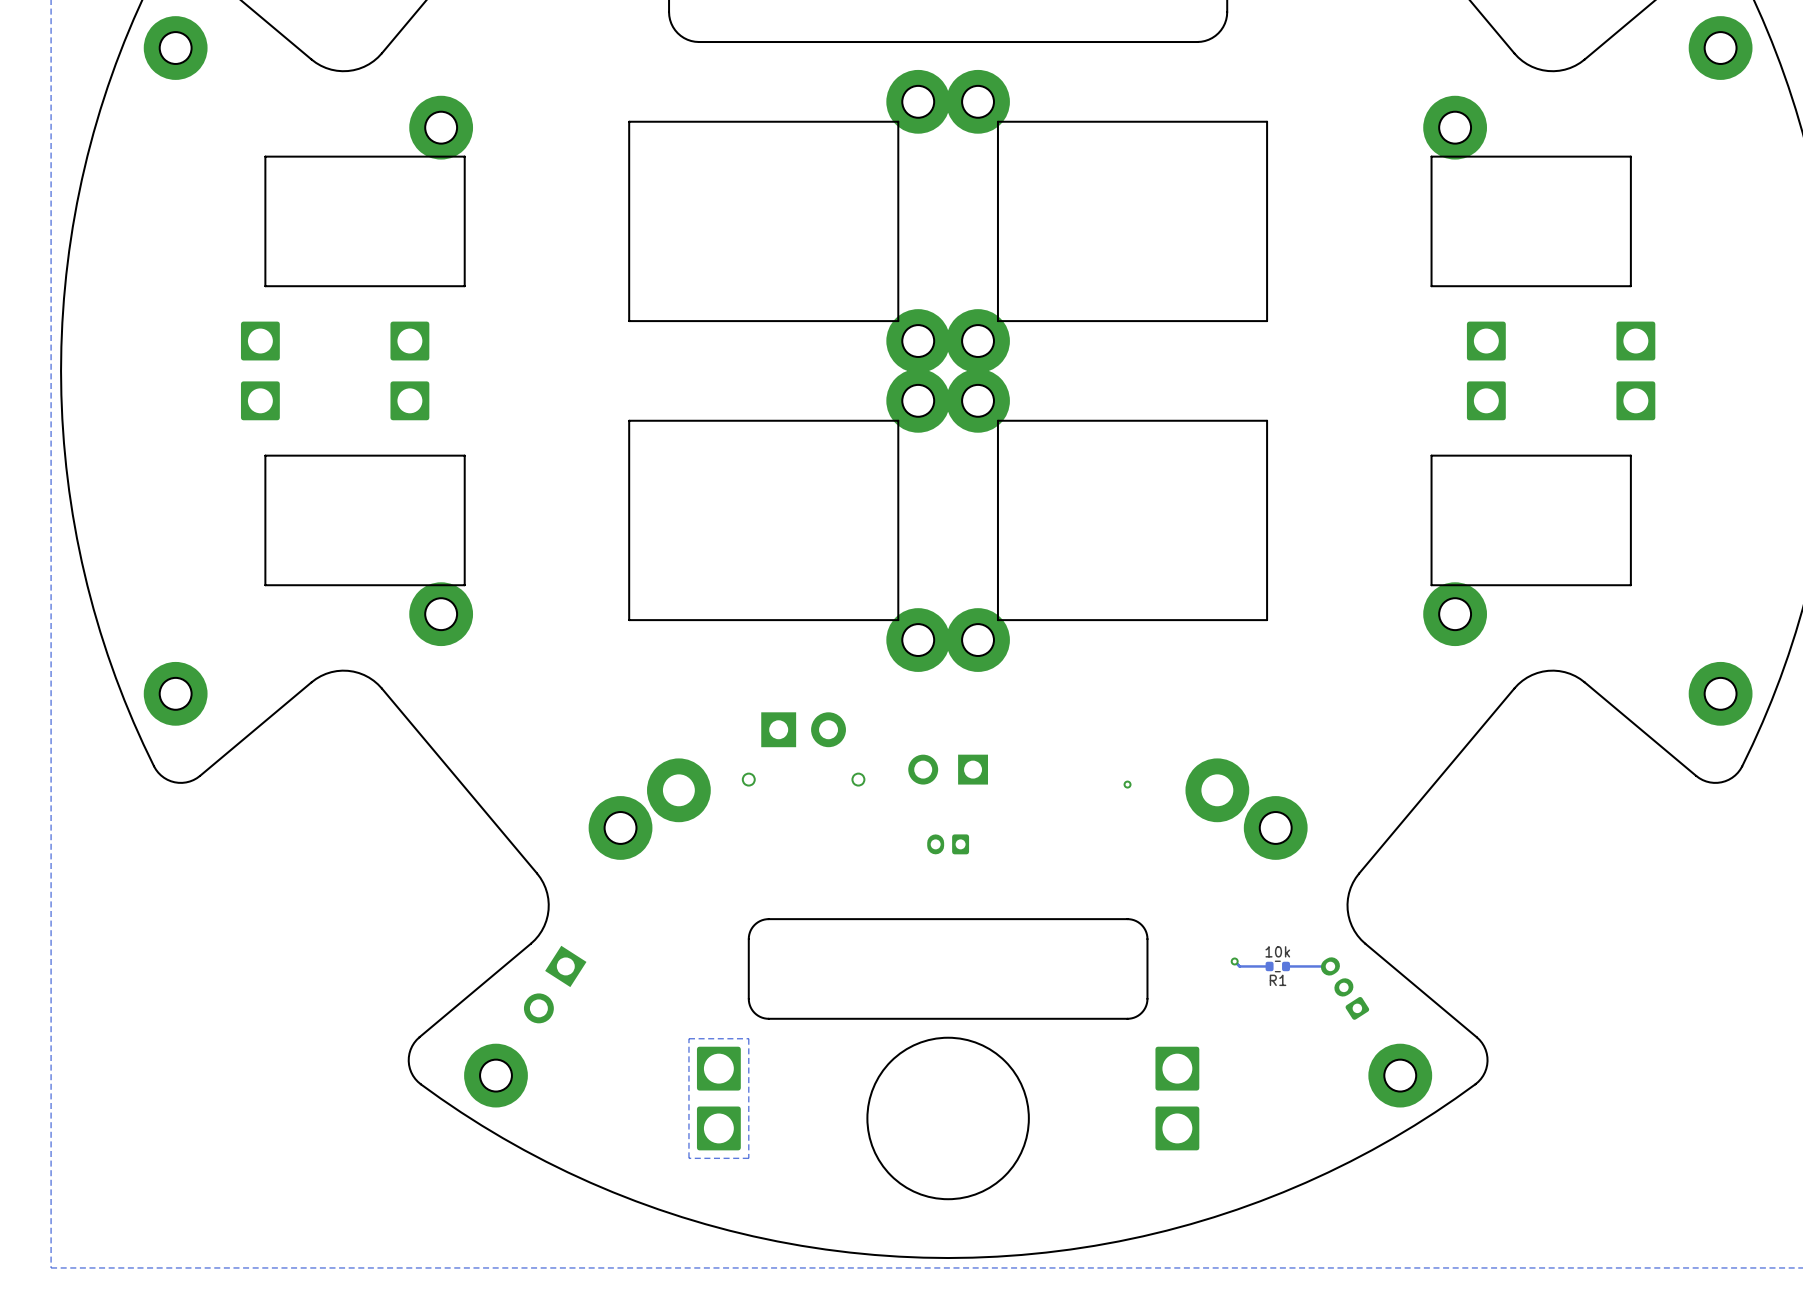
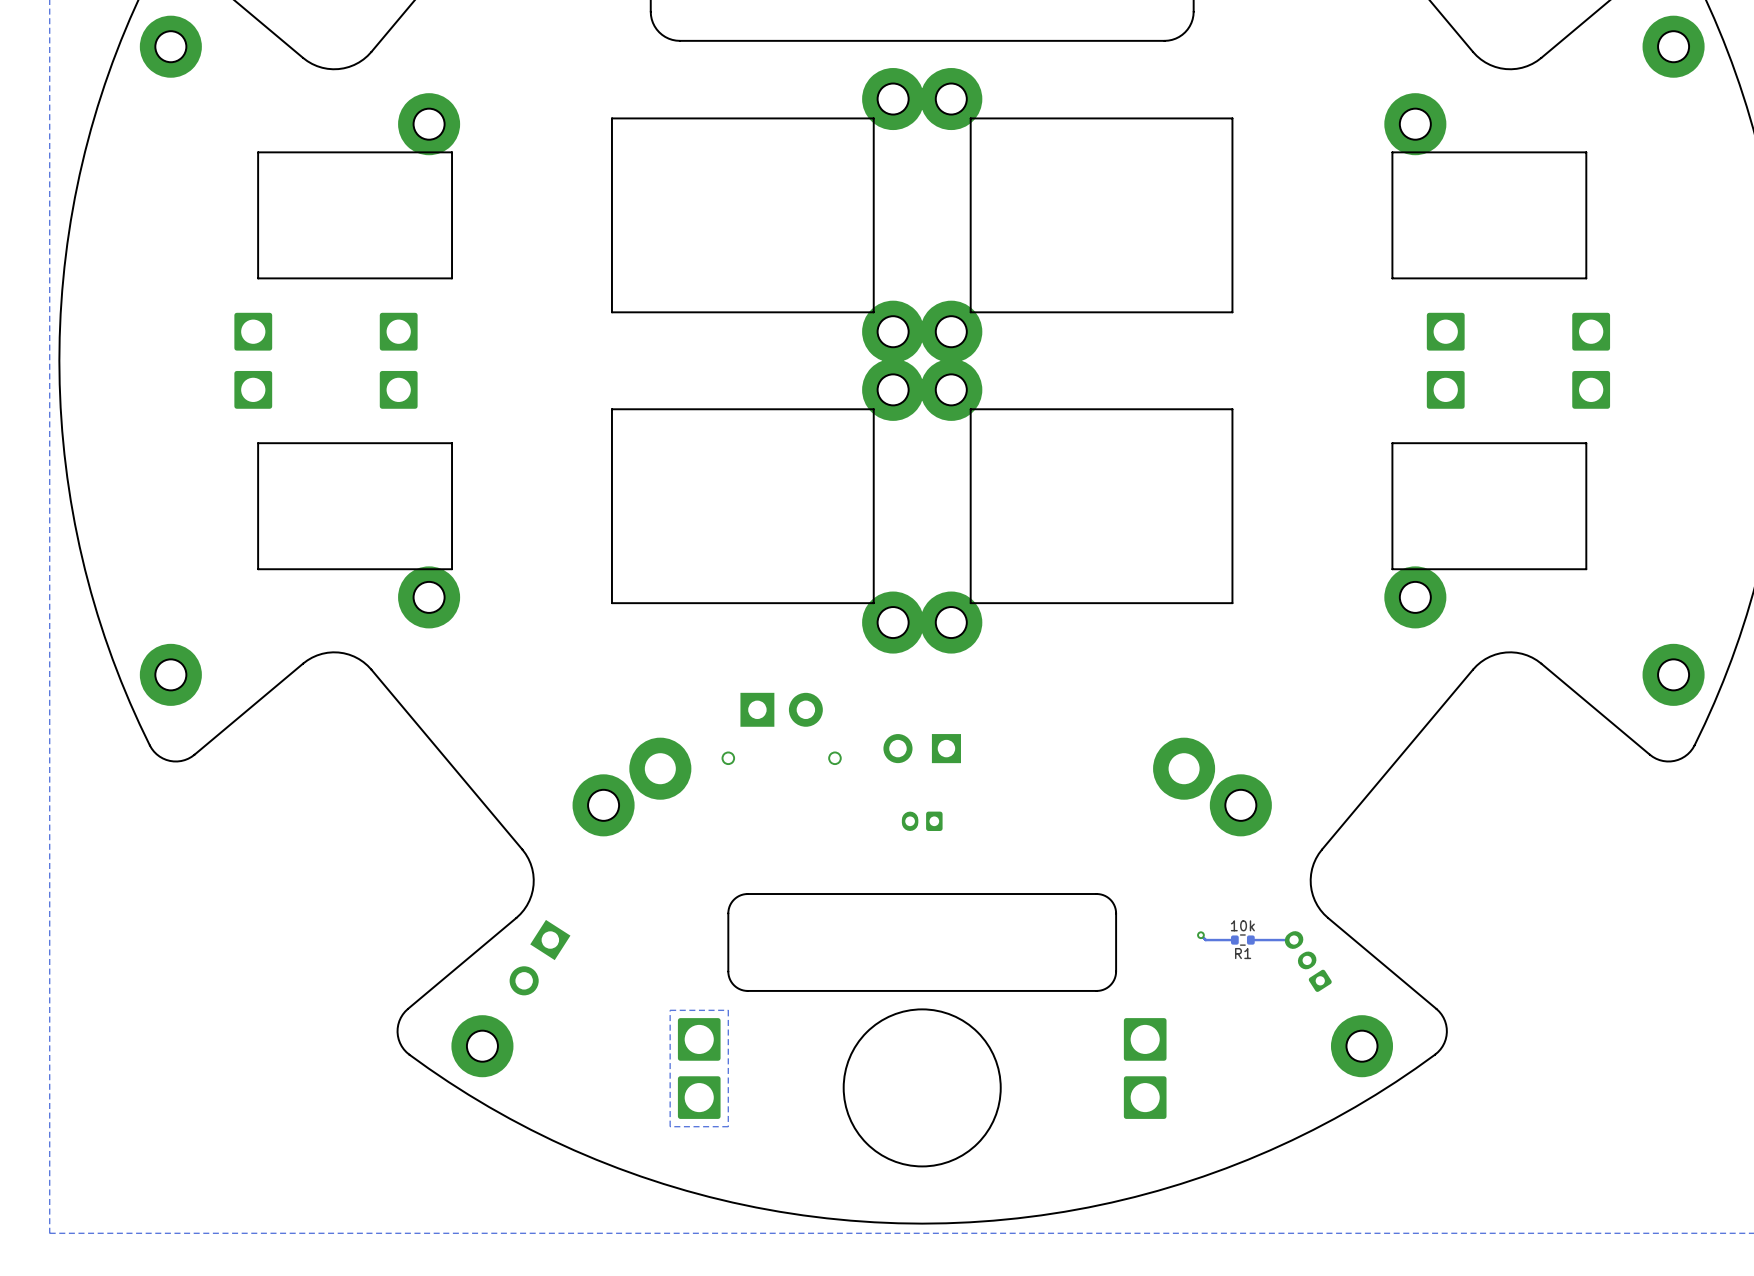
via: (1127, 784) -> none

